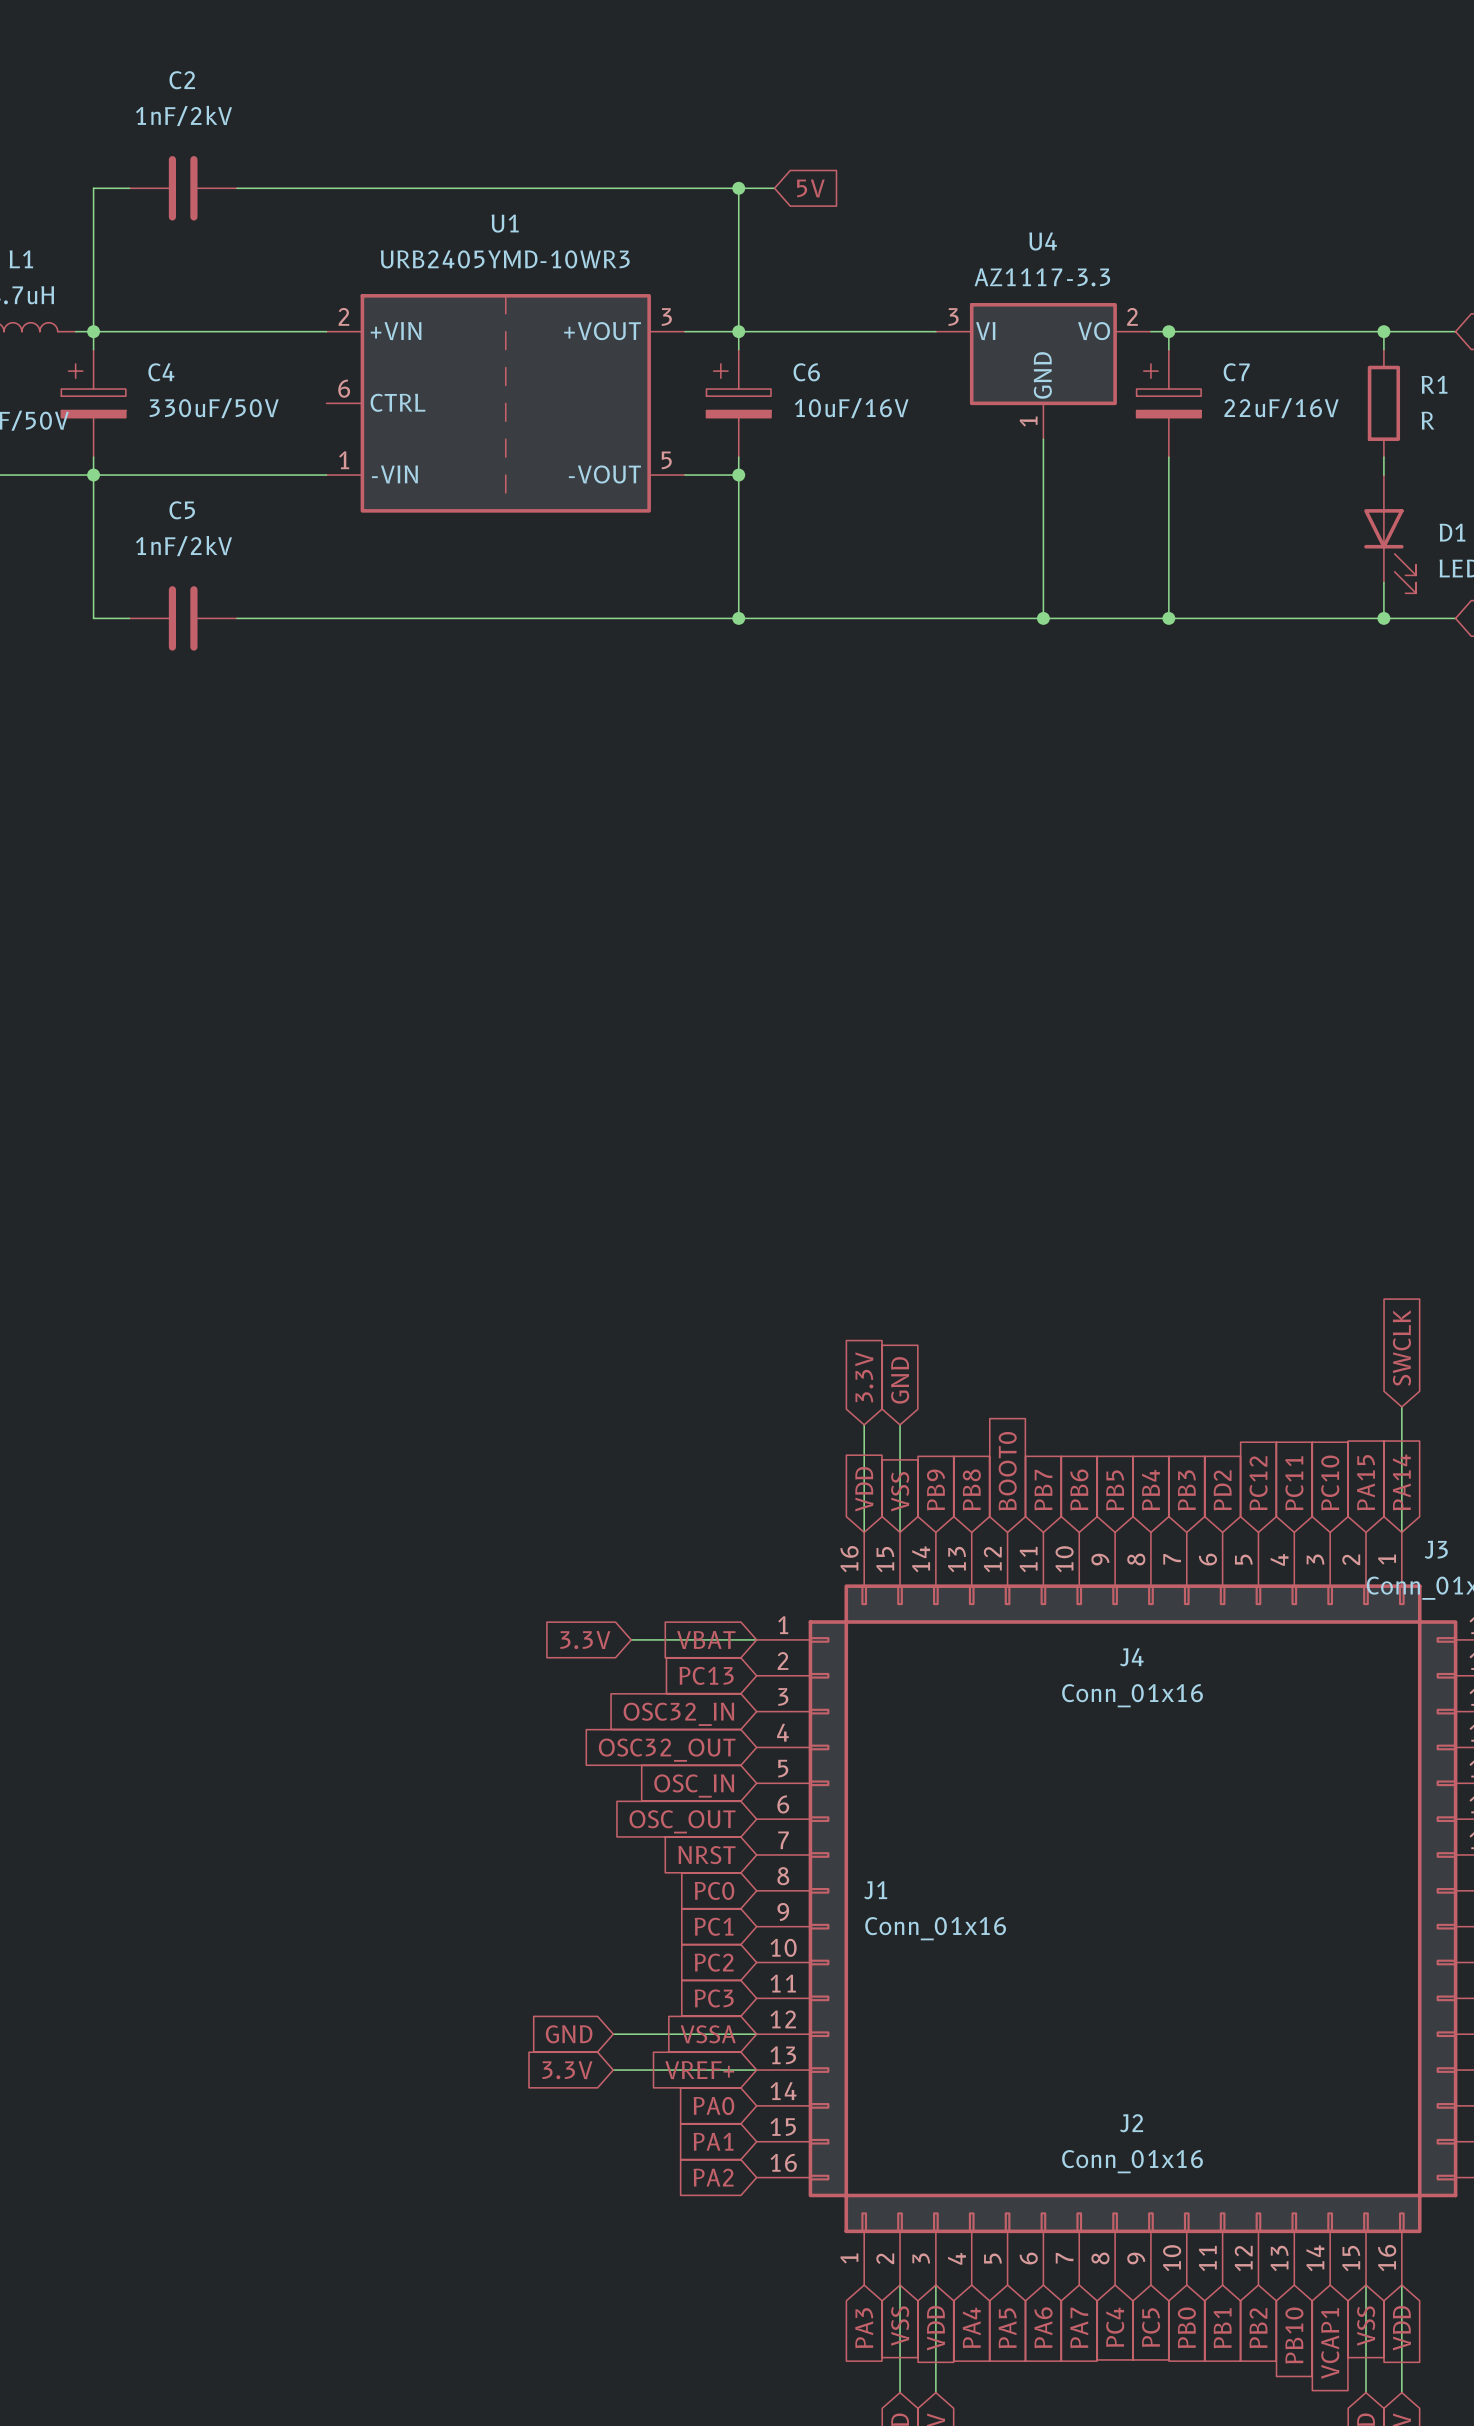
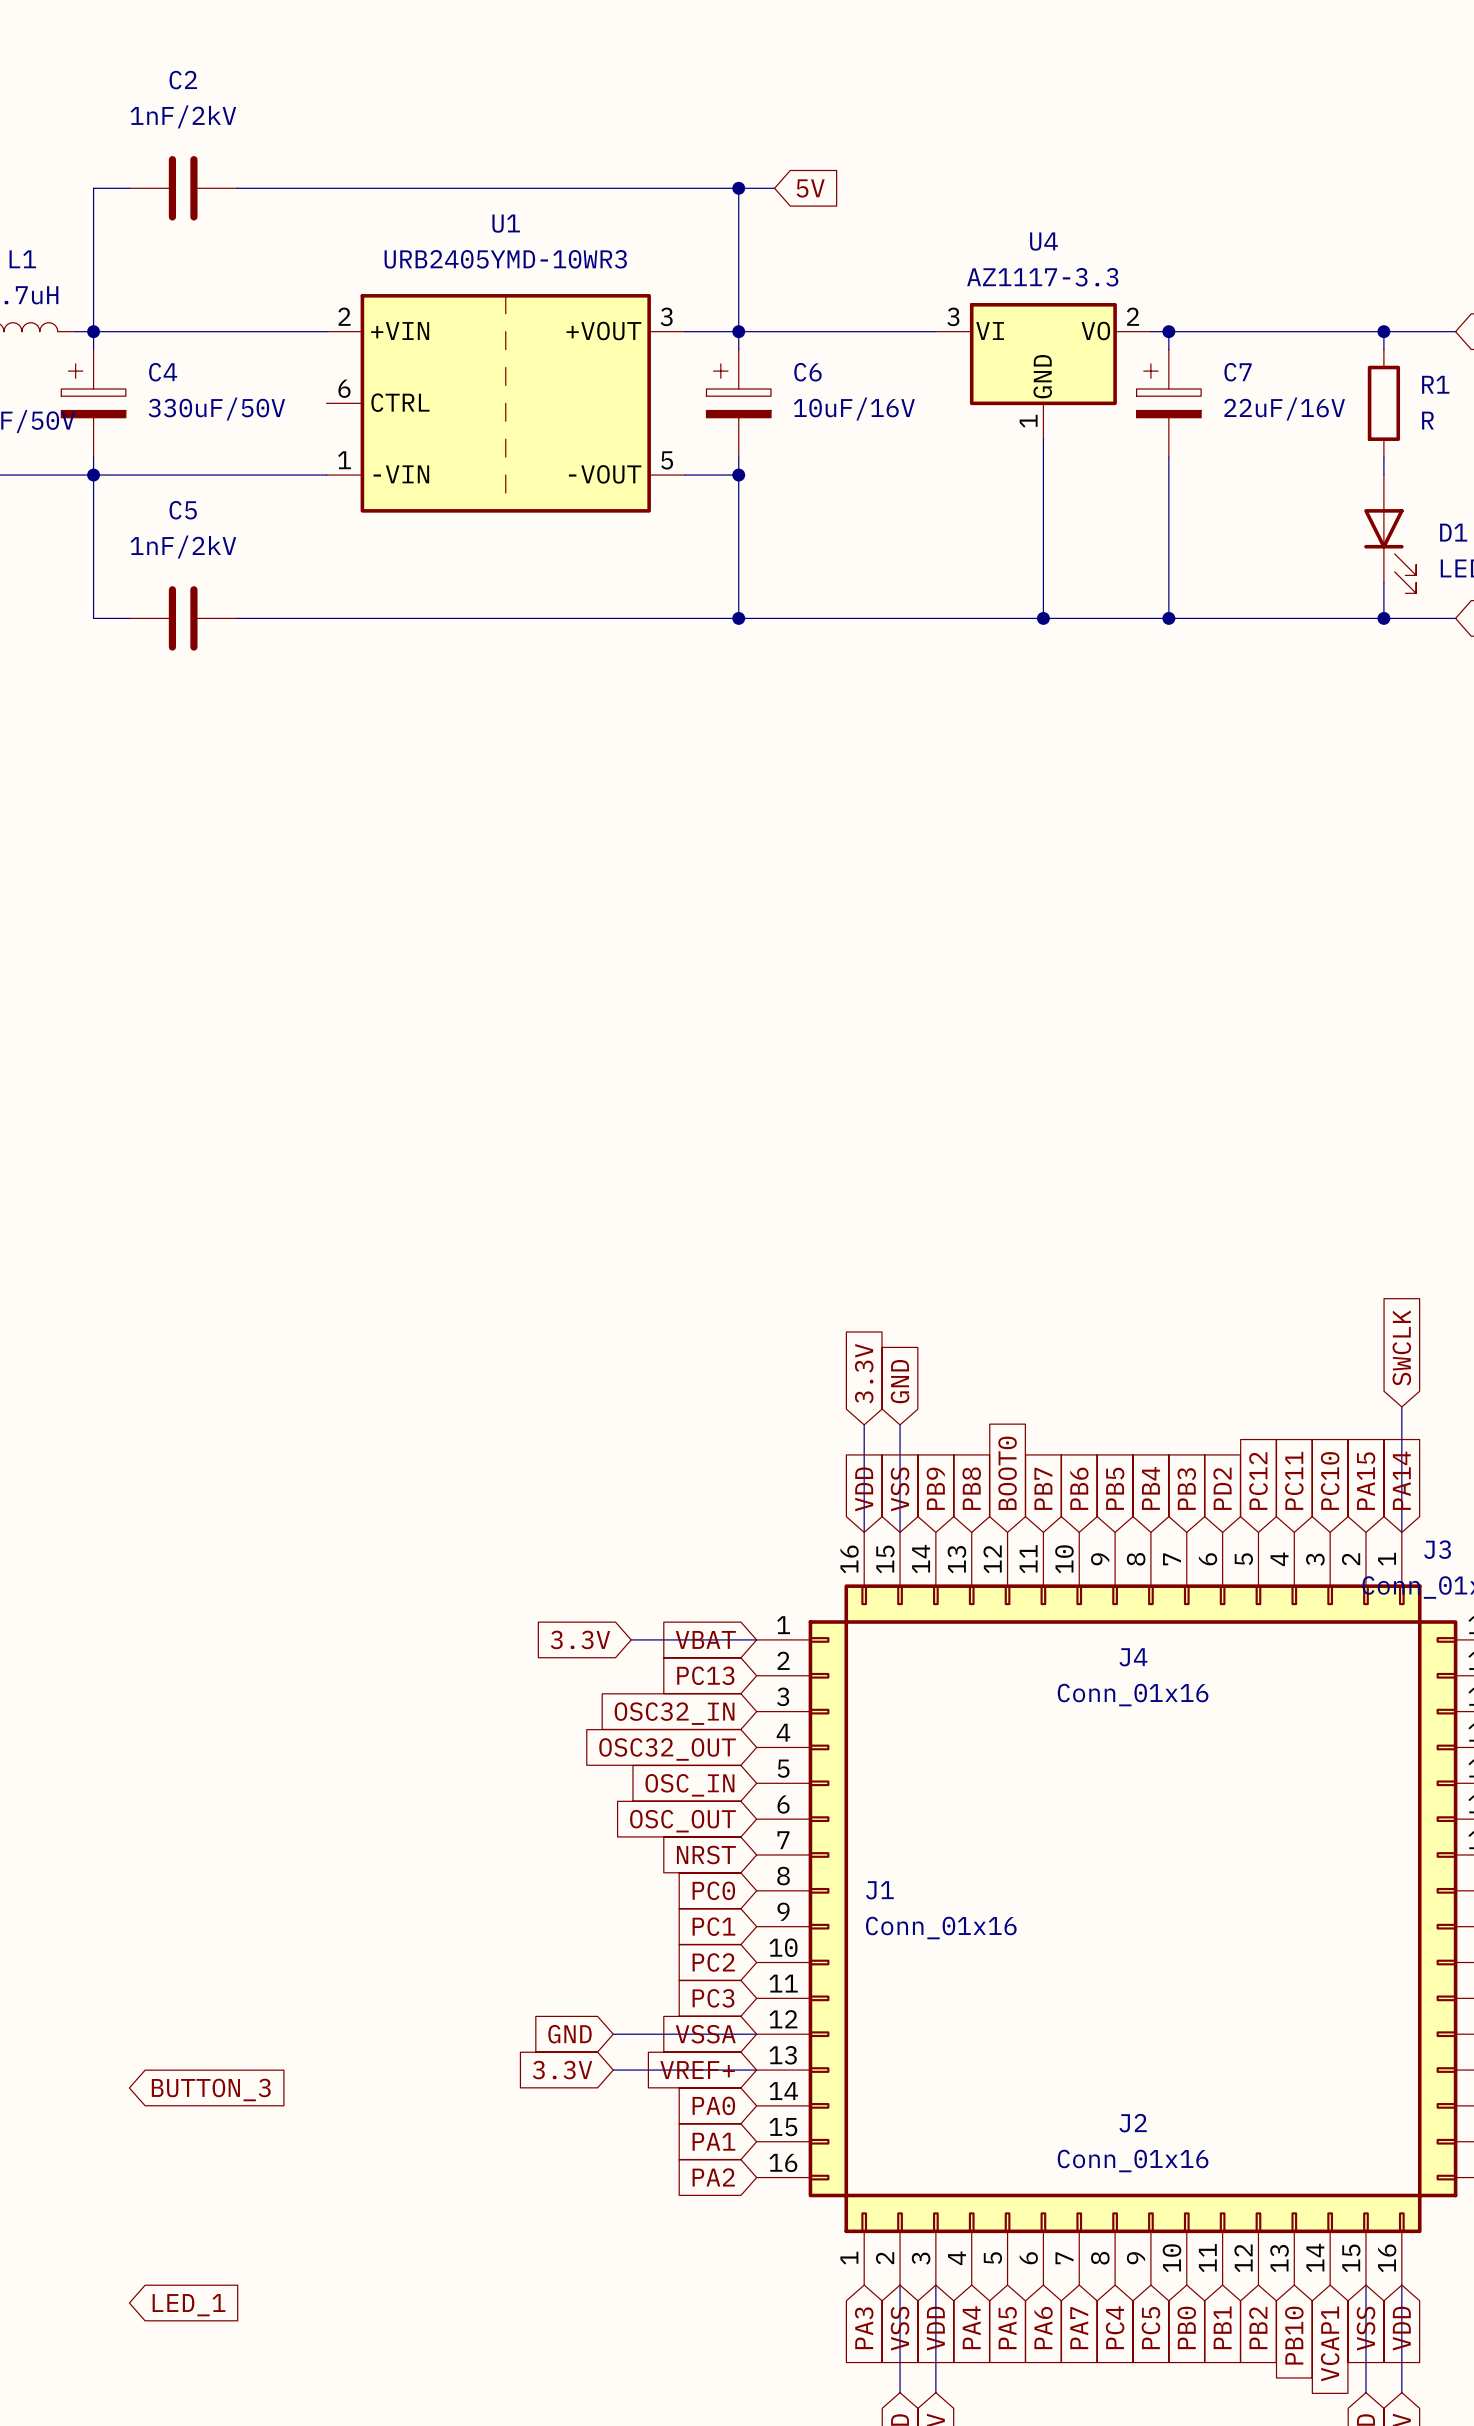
global label: none -> BUTTON_3 (211, 2089)
global label: none -> LED_1 (189, 2305)

